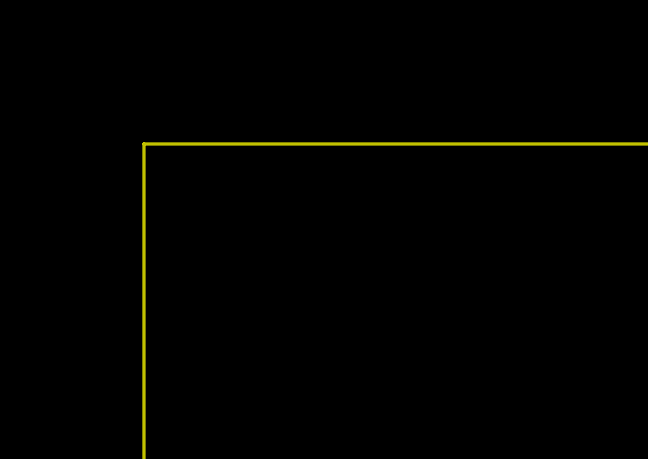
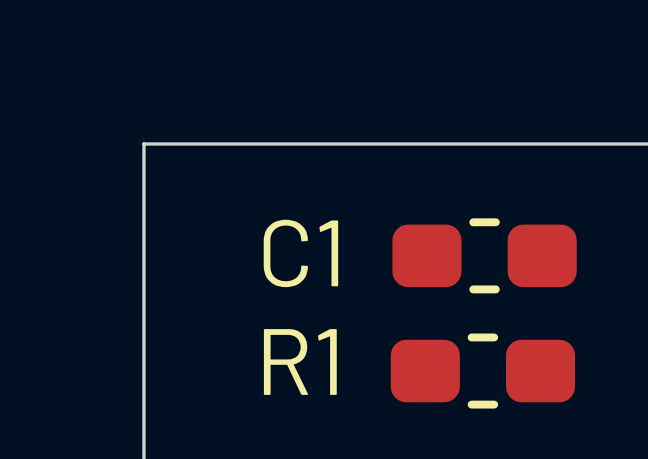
C1: none -> (484, 255)
R1: none -> (482, 371)

